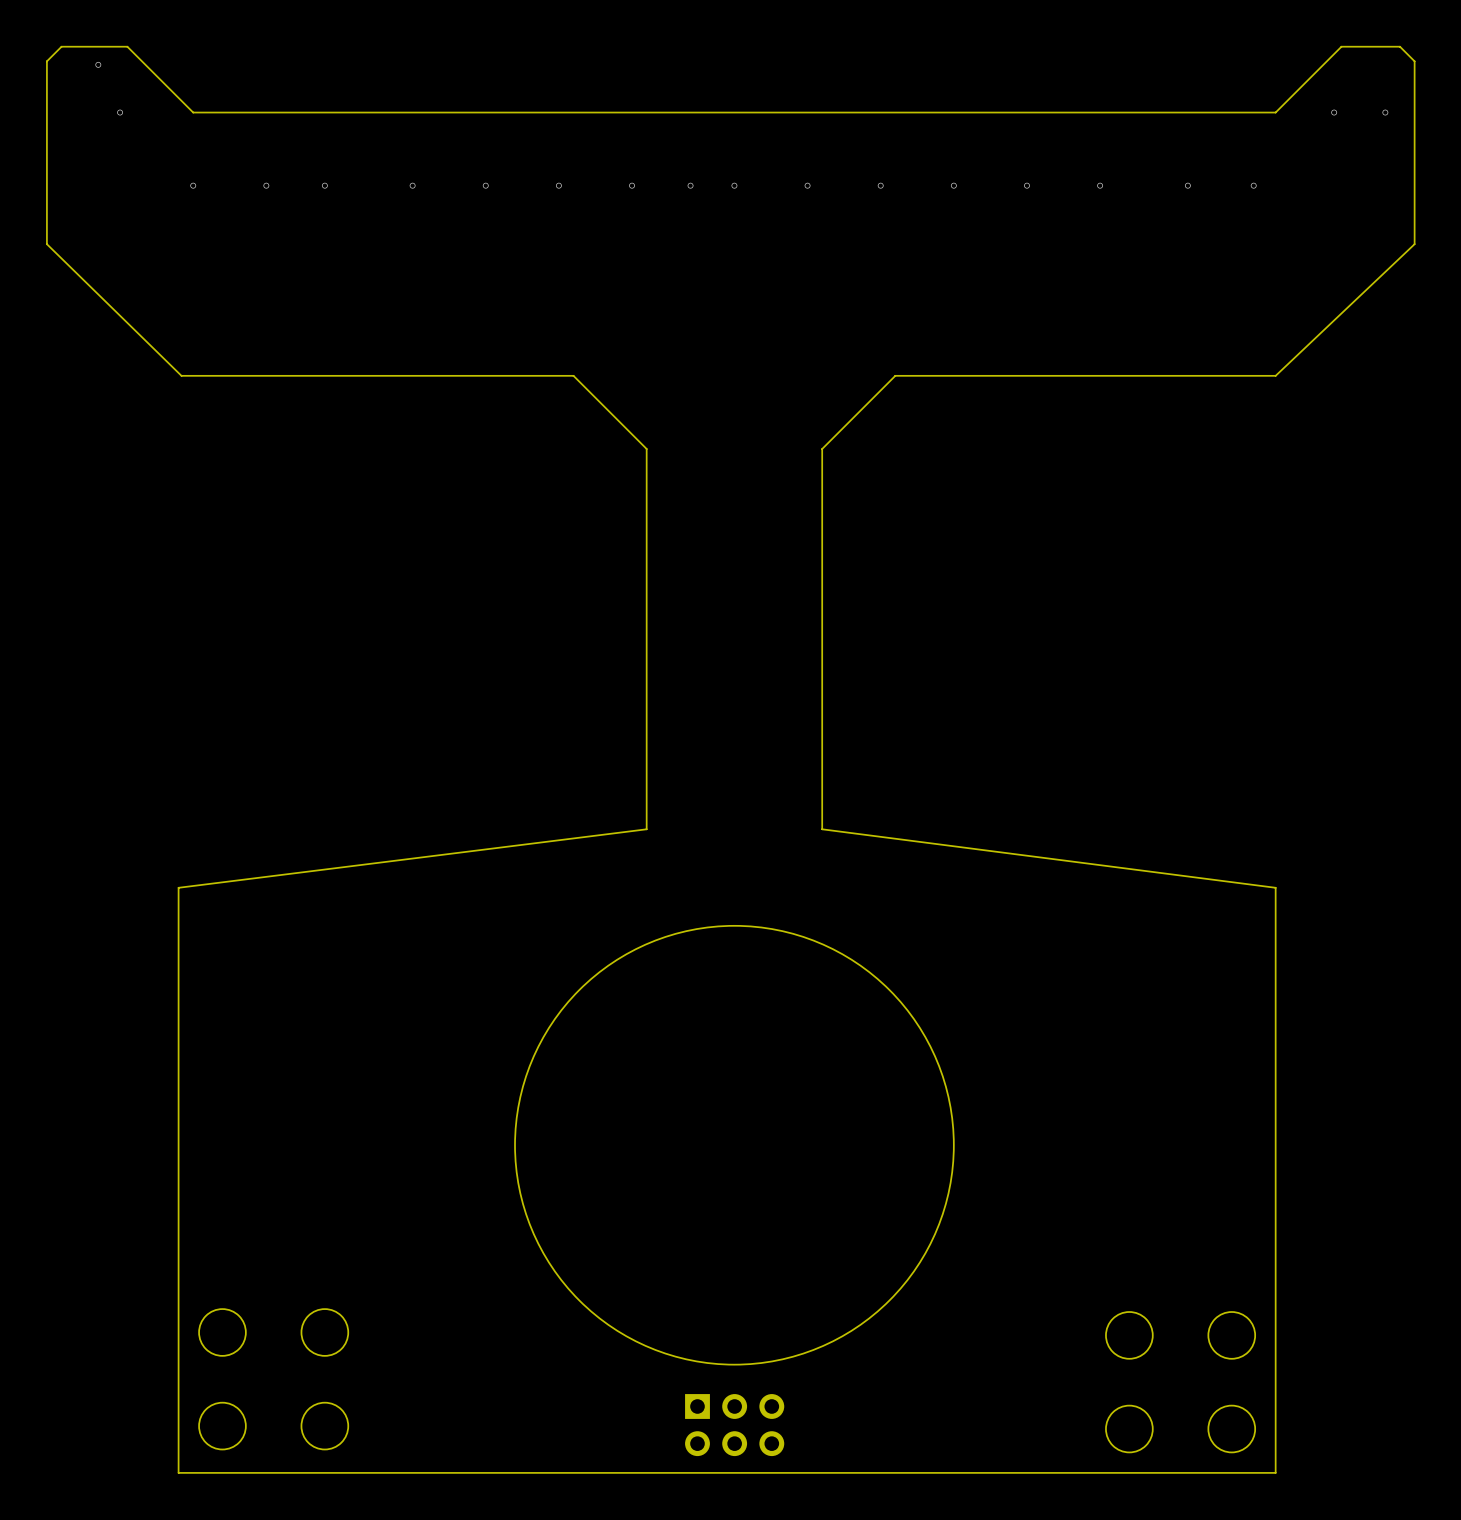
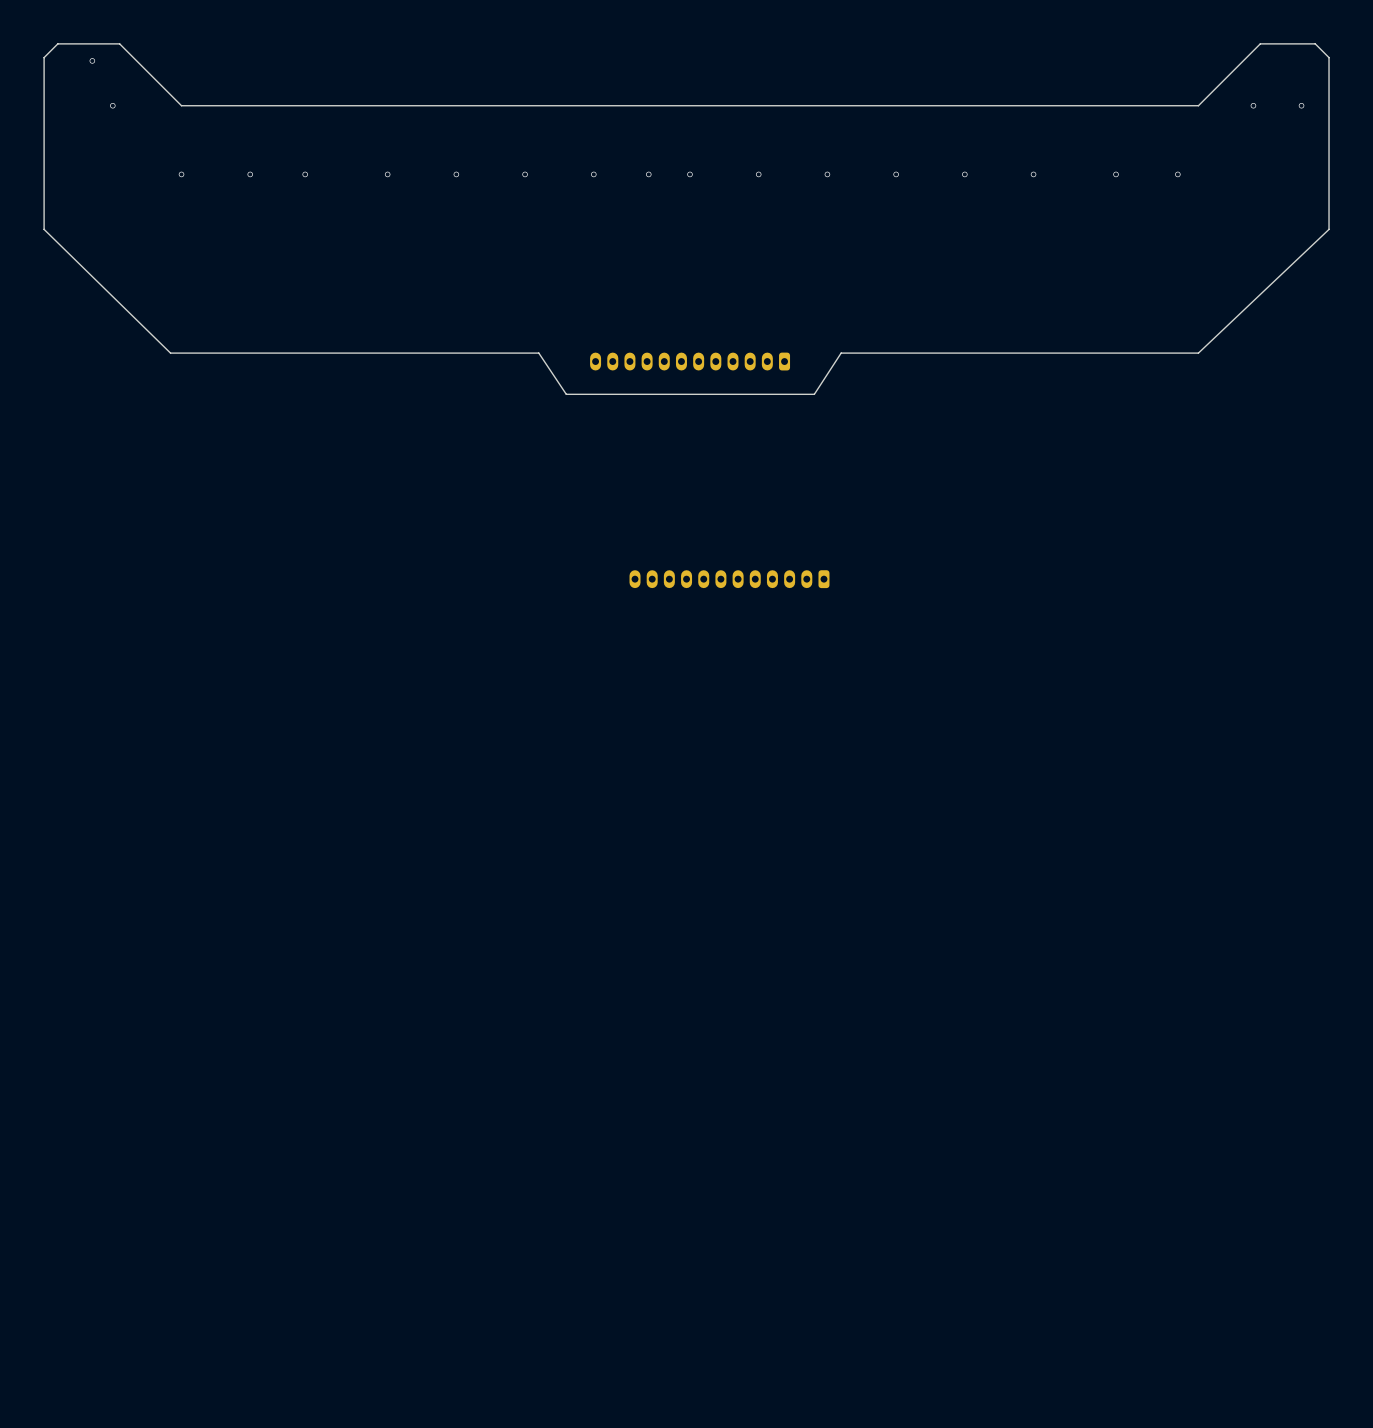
board edge: (895, 375) (822, 448) (822, 829) (1275, 887) (1275, 1472) (178, 1472) (178, 887) (646, 829) (646, 448) (573, 375) -> (841, 353) (814, 394) (566, 394) (538, 353)
part: none -> (690, 361)
part: none -> (729, 579)
round board edge: [514, 925, 955, 1366] -> none
round board edge: [198, 1308, 247, 1357] -> none
round board edge: [300, 1308, 349, 1357] -> none
round board edge: [1105, 1311, 1154, 1360] -> none
round board edge: [1207, 1311, 1256, 1360] -> none
round board edge: [198, 1401, 247, 1451] -> none
round board edge: [300, 1401, 349, 1451] -> none
round board edge: [1105, 1404, 1154, 1454] -> none
round board edge: [1207, 1404, 1256, 1454] -> none
part: (734, 1425) -> none

